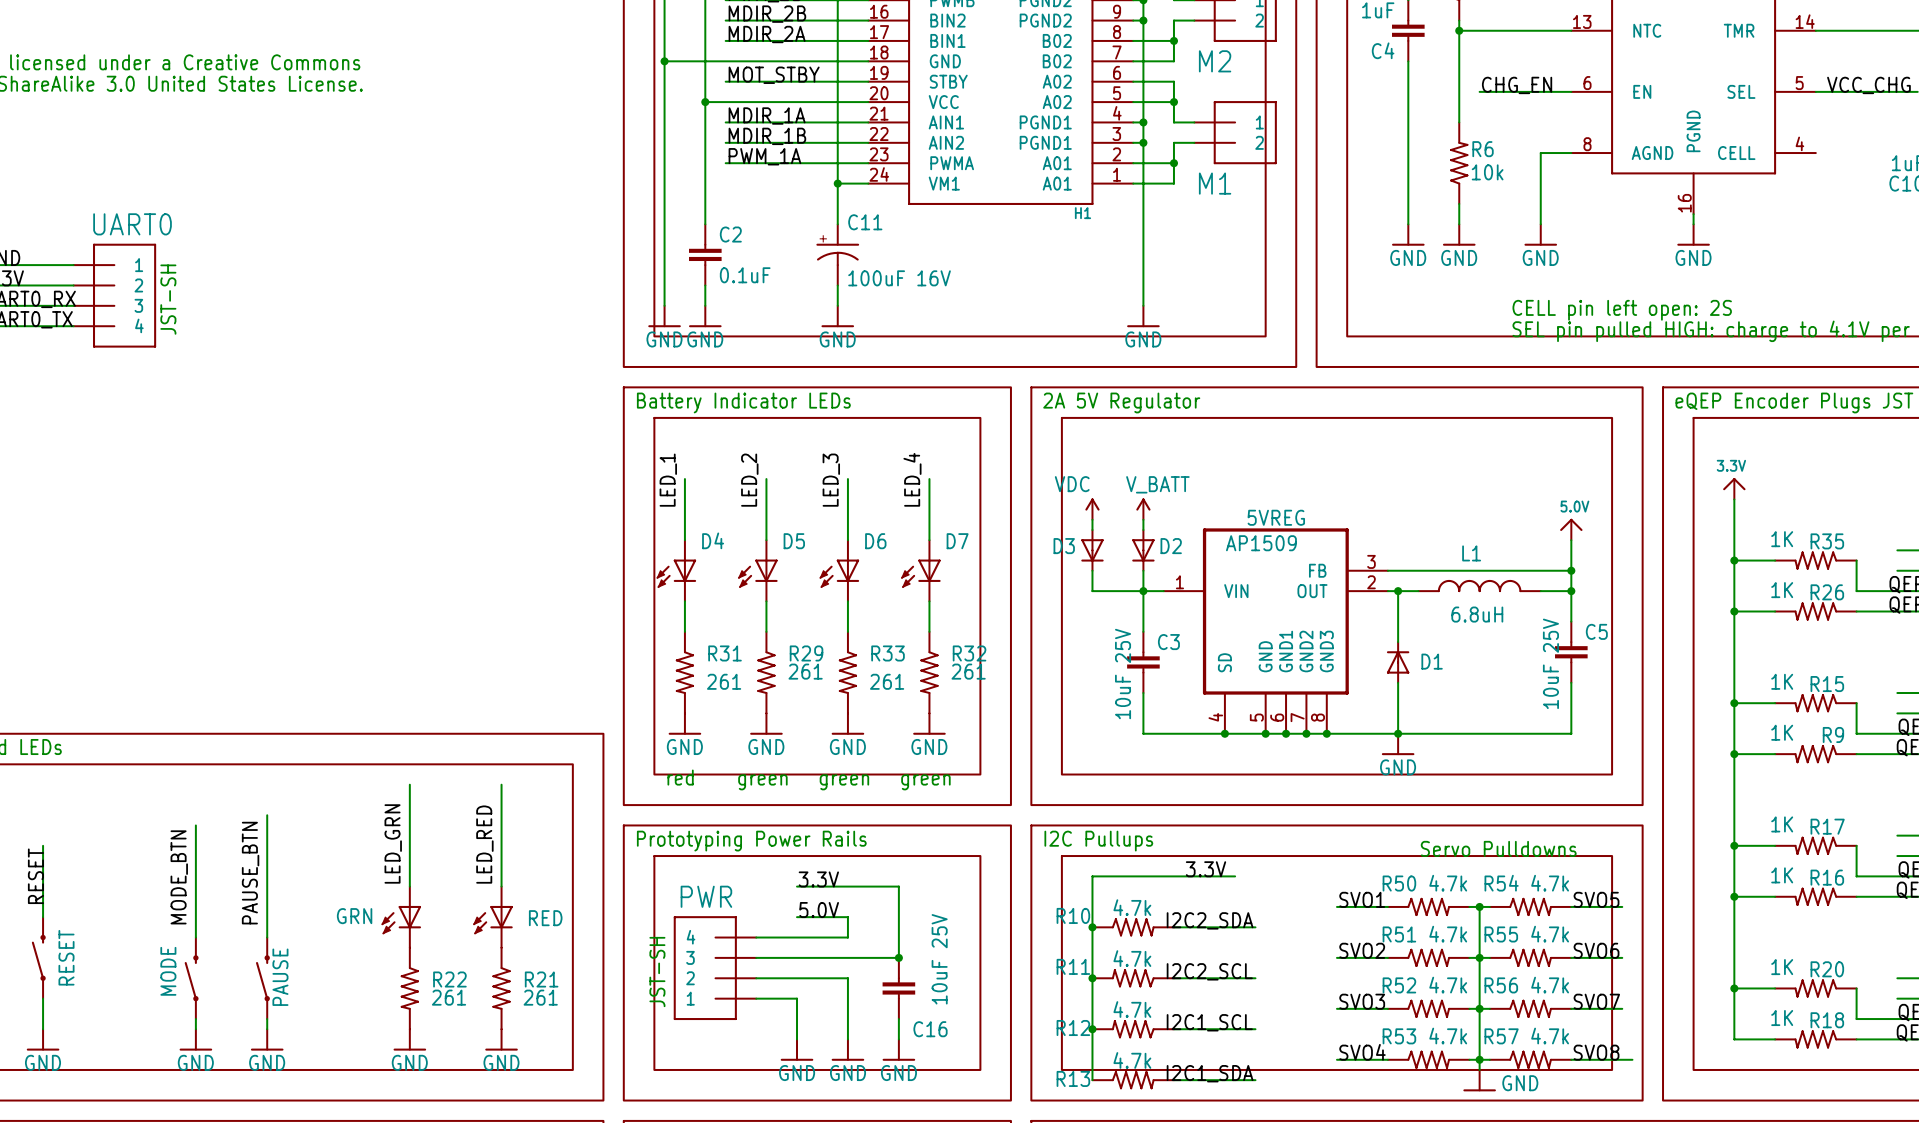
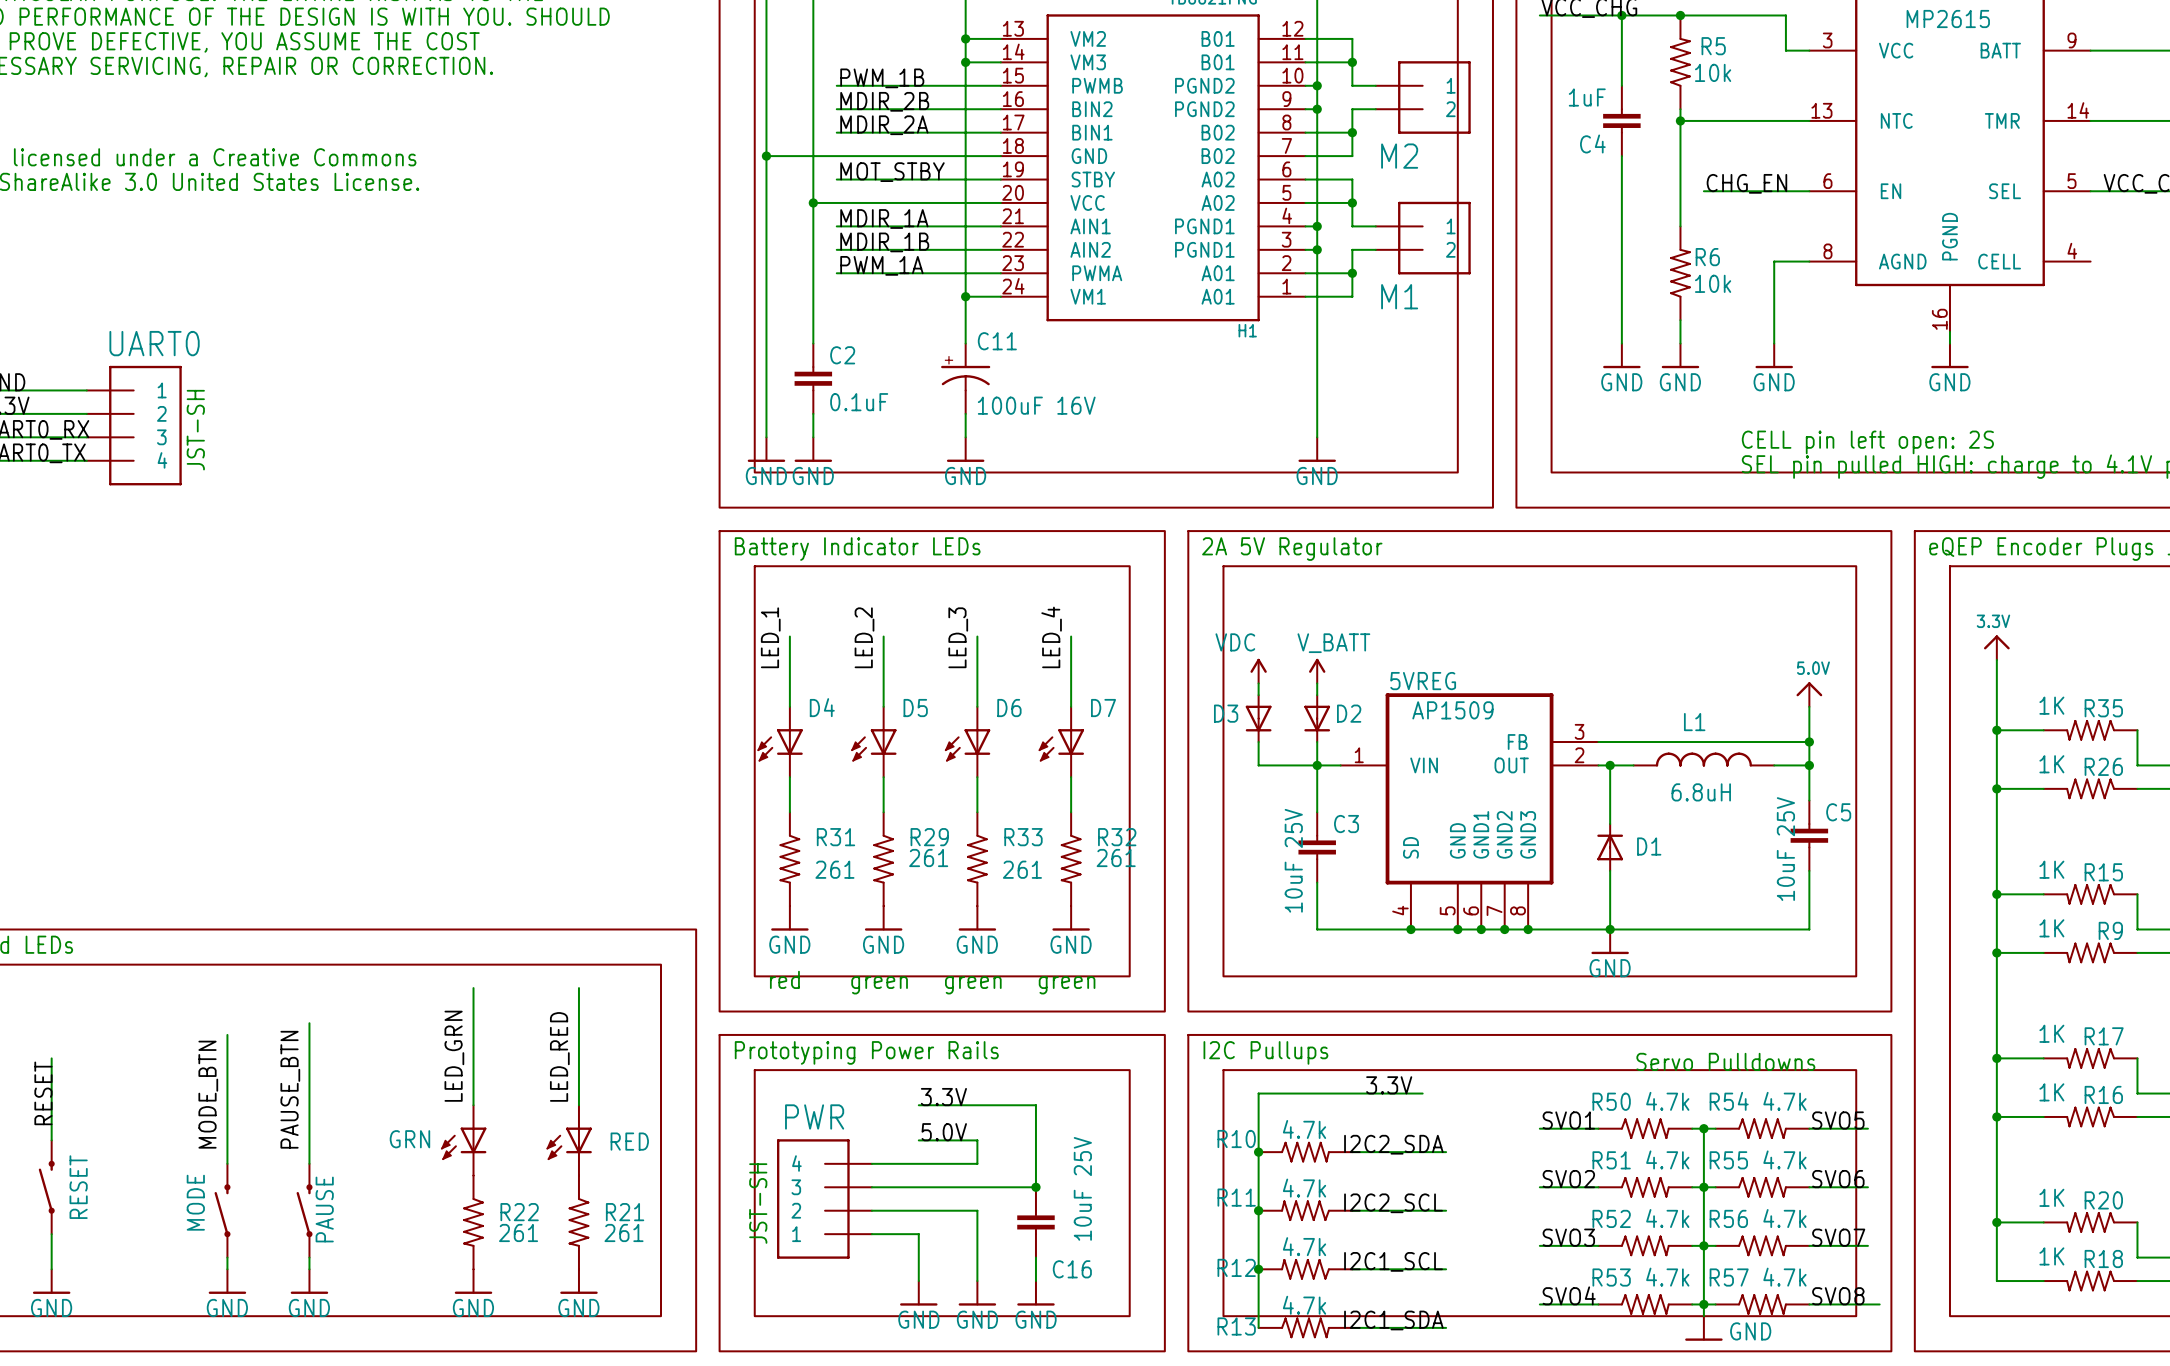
5VREG name position: 5VREG (1276, 517) -> 5VREG (1423, 681)

